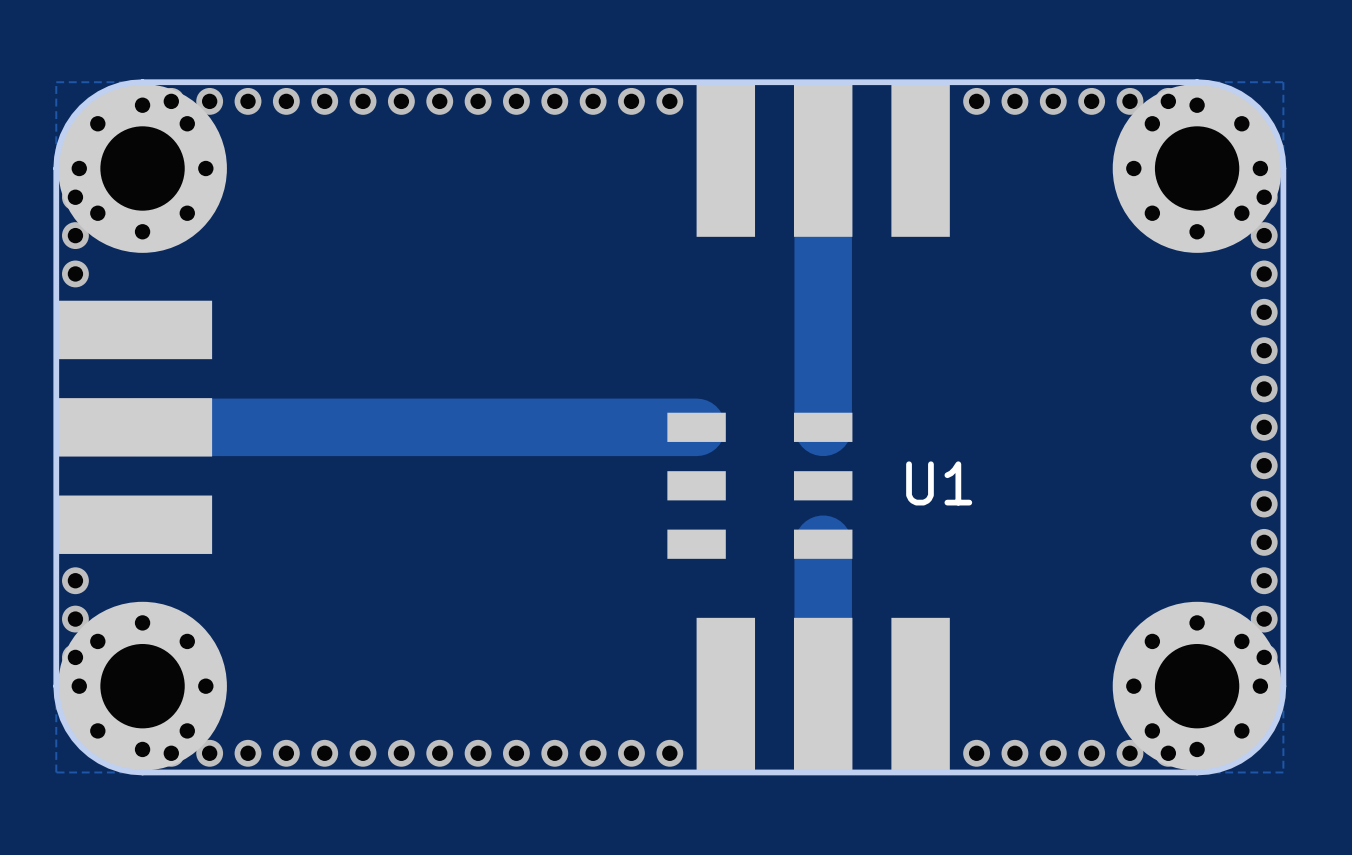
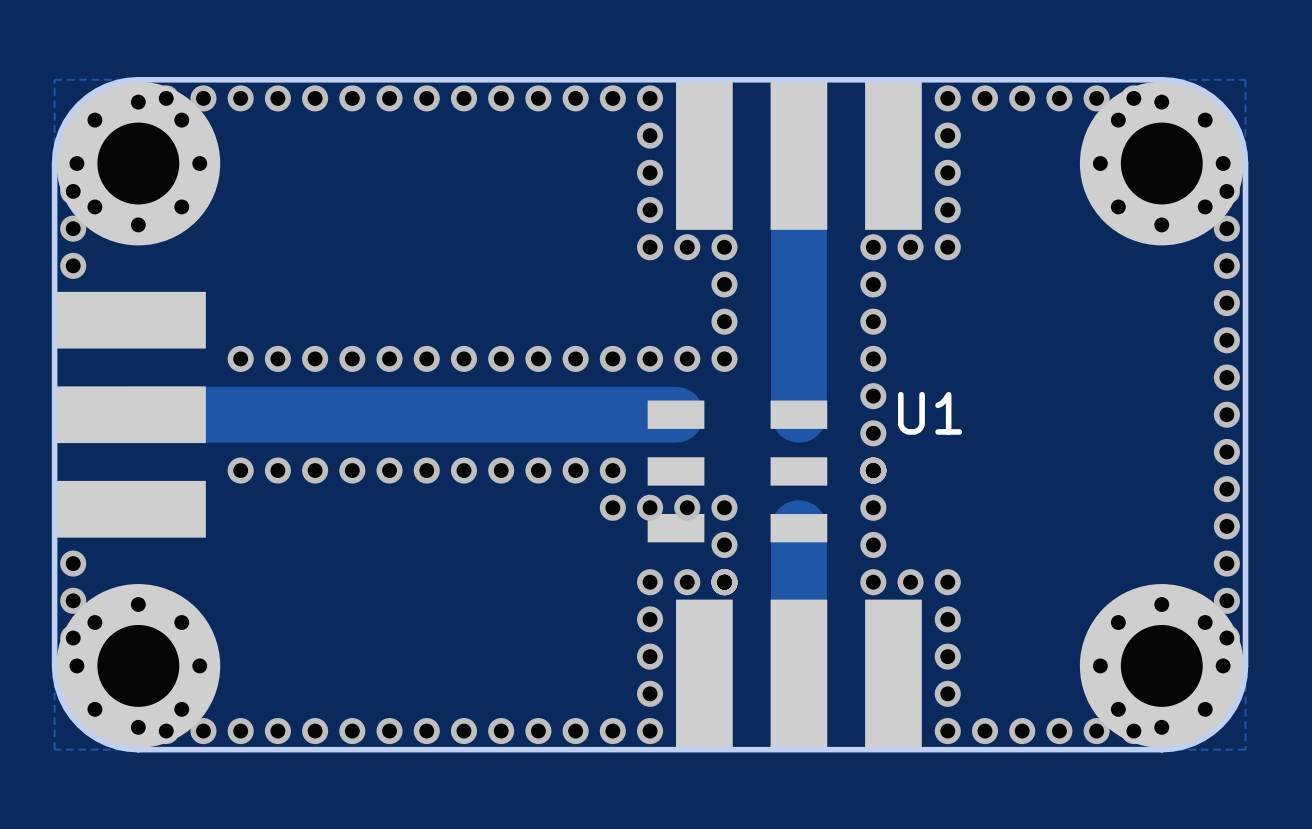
via: none -> (650, 135)
via: none -> (947, 135)
via: none -> (650, 172)
via: none -> (947, 172)
via: none -> (650, 210)
via: none -> (947, 210)
via: none -> (650, 247)
via: none -> (687, 247)
via: none -> (724, 247)
via: none -> (873, 247)
via: none -> (910, 247)
via: none -> (947, 247)
via: none -> (724, 284)
via: none -> (873, 284)
via: none -> (724, 321)
via: none -> (873, 321)
via: none -> (240, 358)
via: none -> (277, 358)
via: none -> (315, 358)
via: none -> (352, 358)
via: none -> (389, 358)
via: none -> (426, 358)
via: none -> (463, 358)
via: none -> (501, 358)
via: none -> (538, 358)
via: none -> (575, 358)
via: none -> (612, 358)
via: none -> (650, 358)
via: none -> (687, 358)
via: none -> (724, 358)
via: none -> (873, 358)
via: none -> (873, 396)
via: none -> (873, 433)
U1 name position: U1 (939, 483) -> U1 (930, 413)
via: none -> (240, 470)
via: none -> (277, 470)
via: none -> (315, 470)
via: none -> (352, 470)
via: none -> (389, 470)
via: none -> (426, 470)
via: none -> (463, 470)
via: none -> (501, 470)
via: none -> (538, 470)
via: none -> (575, 470)
via: none -> (612, 470)
via: none -> (873, 470)
via: none -> (612, 507)
via: none -> (650, 507)
via: none -> (687, 507)
via: none -> (724, 507)
via: none -> (873, 507)
via: none -> (724, 544)
via: none -> (873, 544)
via: none -> (650, 582)
via: none -> (687, 582)
via: none -> (724, 582)
via: none -> (873, 582)
via: none -> (910, 582)
via: none -> (947, 582)
via: none -> (650, 619)
via: none -> (947, 619)
via: none -> (650, 656)
via: none -> (947, 656)
via: none -> (650, 693)
via: none -> (947, 693)

